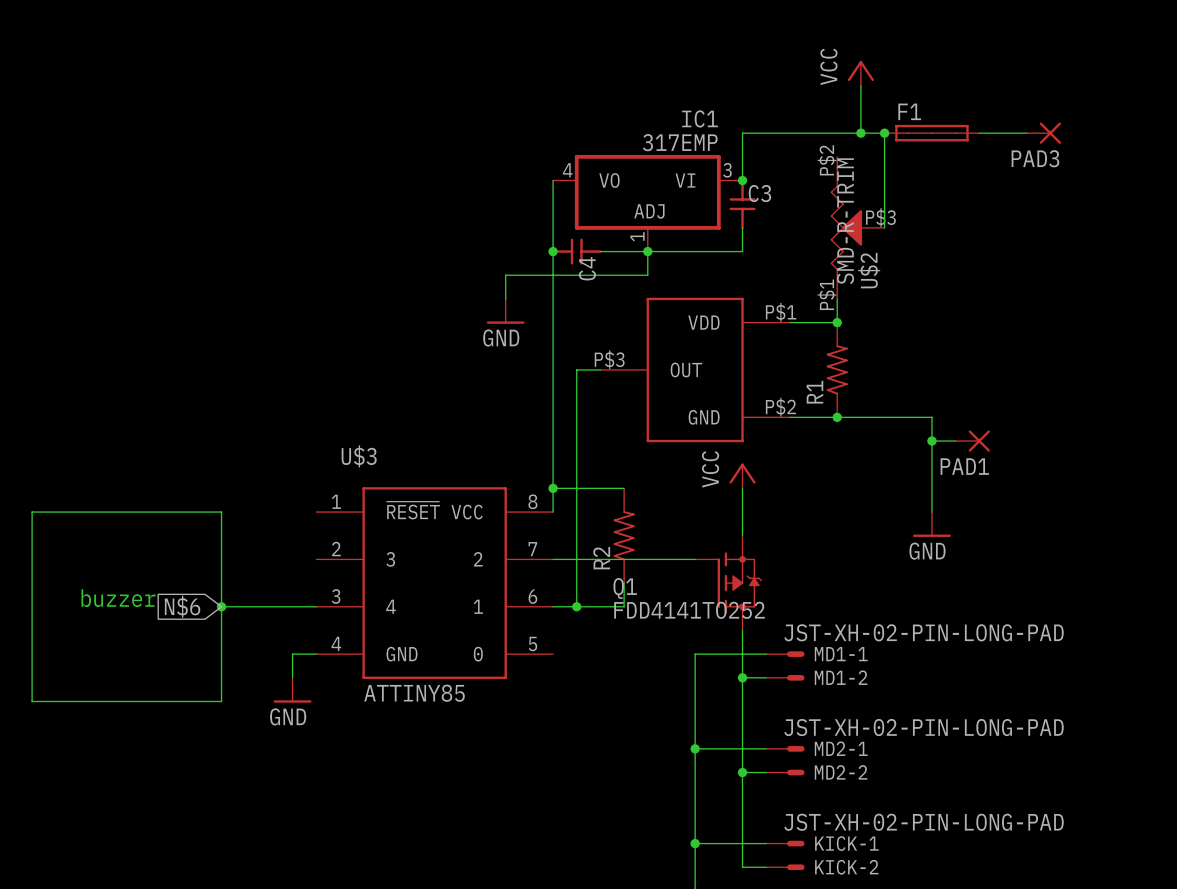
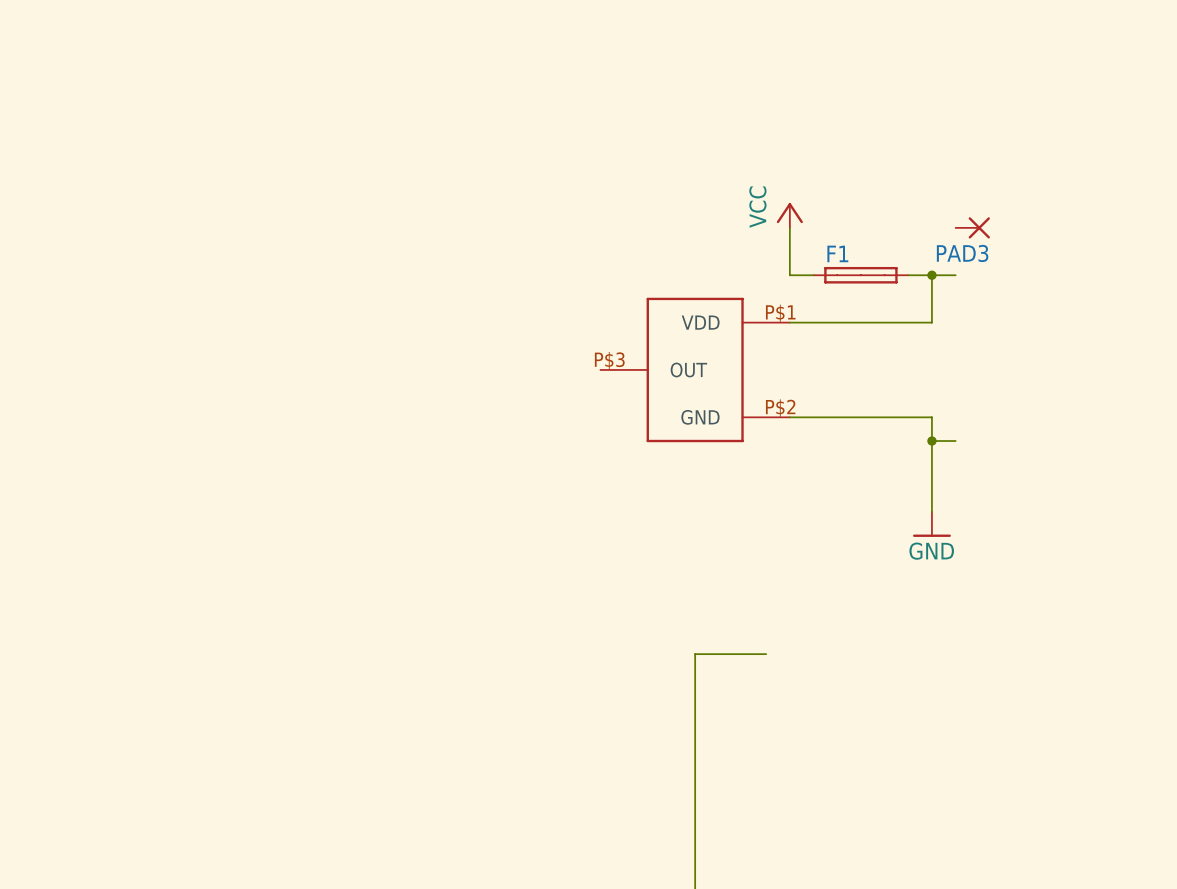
power symbol: VCC (860, 73) -> none
wire: (860, 85) (860, 133) -> none
junction: (860, 133) -> none
junction: (884, 133) -> none
F1 position: (931, 133) -> (860, 275)
wire: (979, 133) (1026, 133) -> (908, 275) (955, 275)
PAD3 position: (1043, 133) -> (972, 227)
wire: (553, 180) (553, 512) -> none
wire: (742, 180) (742, 133) (884, 133) (884, 227) -> none
junction: (742, 180) -> none
IC1: 317EMP (647, 203) -> none
C3: (742, 204) -> none
power symbol: none -> VCC (789, 215)
wire: (742, 227) (742, 251) (600, 251) -> none
wire: none -> (789, 227) (789, 275) (813, 275)
U$2: SMD-R-TRIM (857, 227) -> none
junction: (553, 251) -> none
C4: (576, 251) -> none
wire: (647, 251) (647, 275) (505, 275) (505, 298) -> none
junction: (647, 251) -> none
junction: none -> (931, 275)
wire: (837, 298) (837, 322) -> (931, 275) (931, 322) (837, 322)
power symbol: GND (505, 311) -> none
junction: (837, 322) -> none
wire: (600, 369) (576, 369) (576, 606) -> none
R1: (837, 369) -> none
junction: (837, 417) -> none
PAD1: (972, 441) -> none
power symbol: VCC (742, 475) -> none
wire: (553, 488) (624, 488) -> none
junction: (553, 488) -> none
wire: (742, 488) (742, 535) -> none
wire: (32, 512) (221, 512) (221, 701) (32, 701) (32, 512) -> none
R2: (624, 535) -> none
wire: (553, 559) (695, 559) -> none
U$3: ATTINY85 (434, 583) -> none
wire: (624, 583) (624, 606) (553, 606) -> none
Q1: FDD4141TO252 (728, 583) -> none
text: buzzer (118, 598) -> none
global label: N$6 (182, 606) -> none
wire: (221, 606) (316, 606) -> none
junction: (221, 606) -> none
junction: (576, 606) -> none
wire: (742, 630) (742, 867) (766, 867) -> none
wire: (316, 654) (292, 654) (292, 677) -> none
MD1-1: JST-XH-02-PIN-LONG-PAD (785, 654) -> none
wire: (742, 677) (766, 677) -> none
junction: (742, 677) -> none
MD1-2: (785, 677) -> none
power symbol: GND (292, 690) -> none
wire: (695, 748) (766, 748) -> none
junction: (695, 748) -> none
MD2-1: JST-XH-02-PIN-LONG-PAD (785, 748) -> none
wire: (742, 772) (766, 772) -> none
junction: (742, 772) -> none
MD2-2: (785, 772) -> none
wire: (695, 843) (766, 843) -> none
junction: (695, 843) -> none
KICK-1: JST-XH-02-PIN-LONG-PAD (785, 843) -> none
KICK-2: (785, 867) -> none

